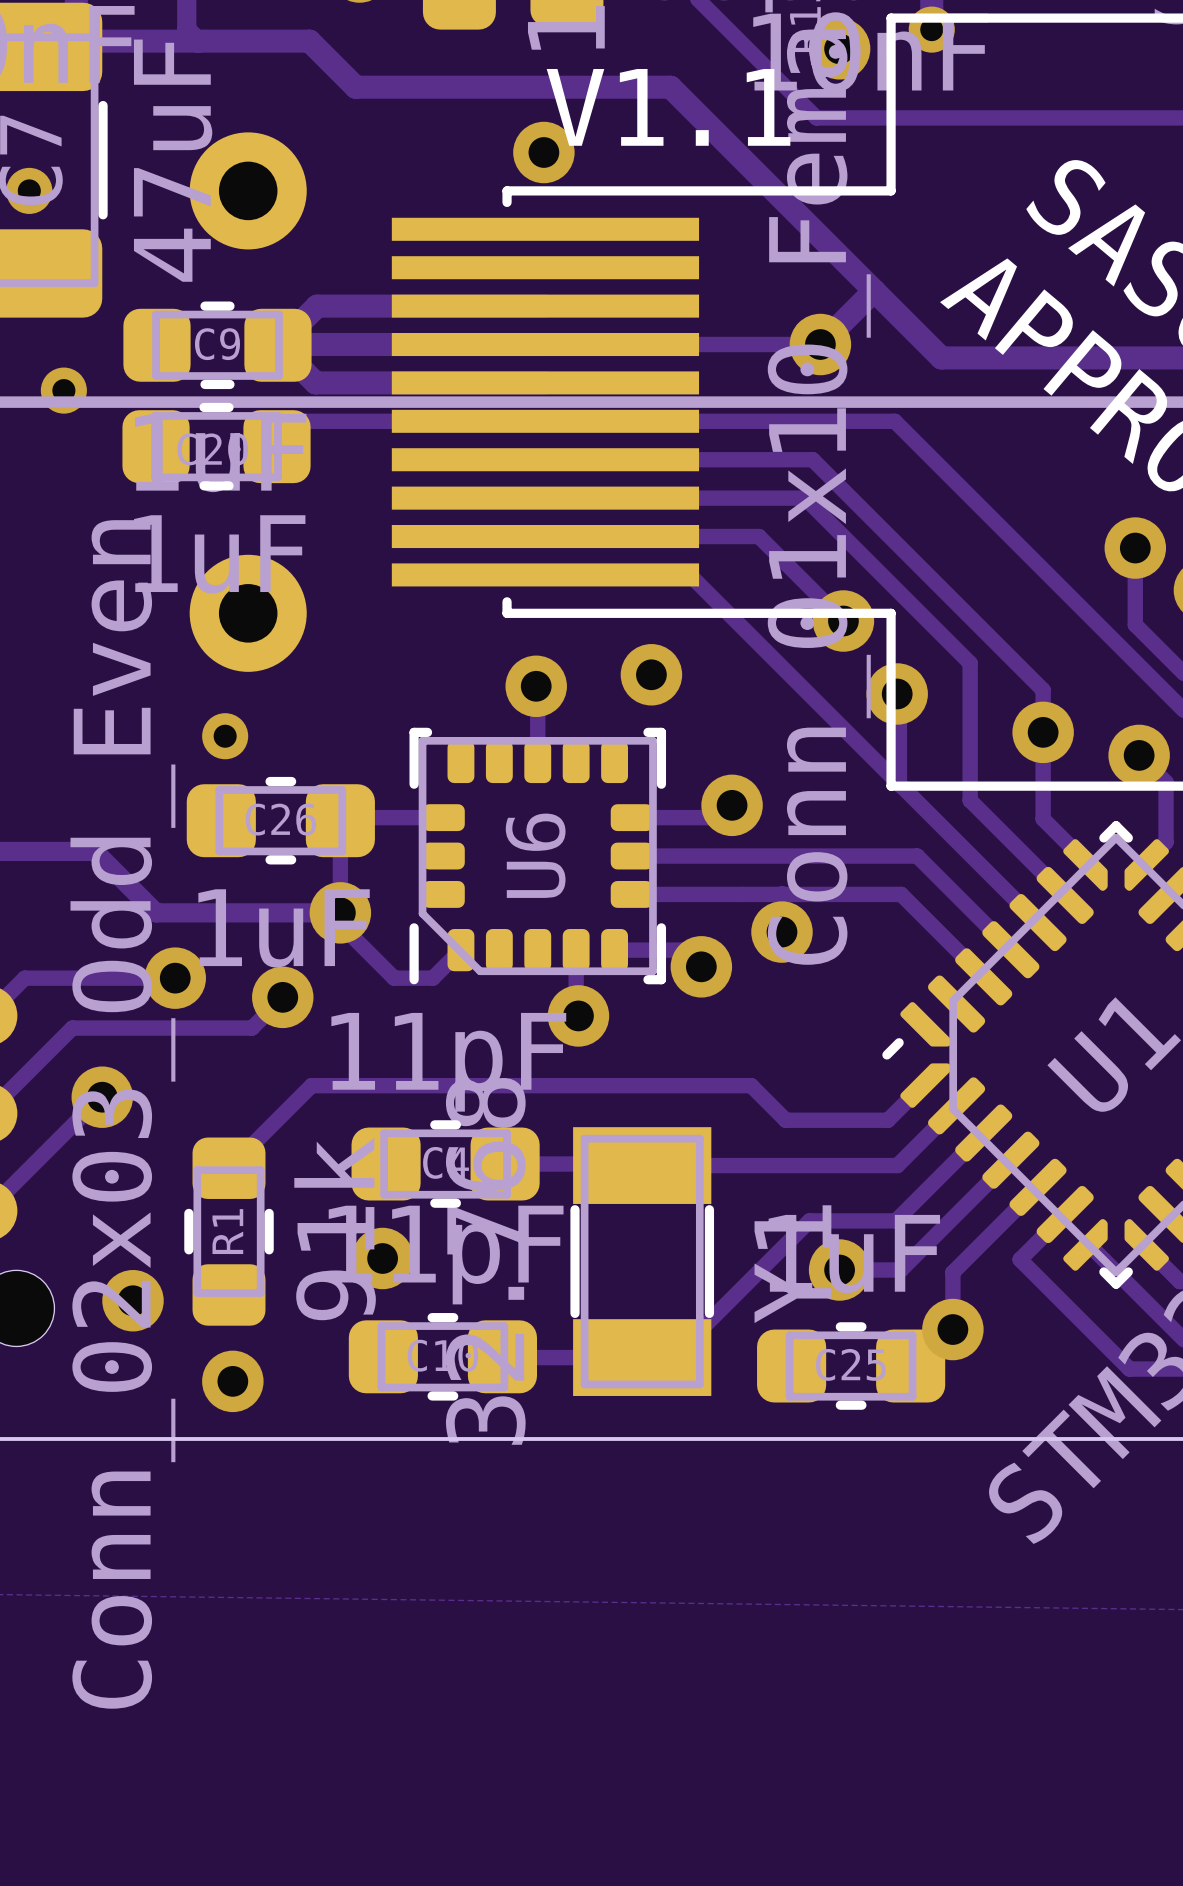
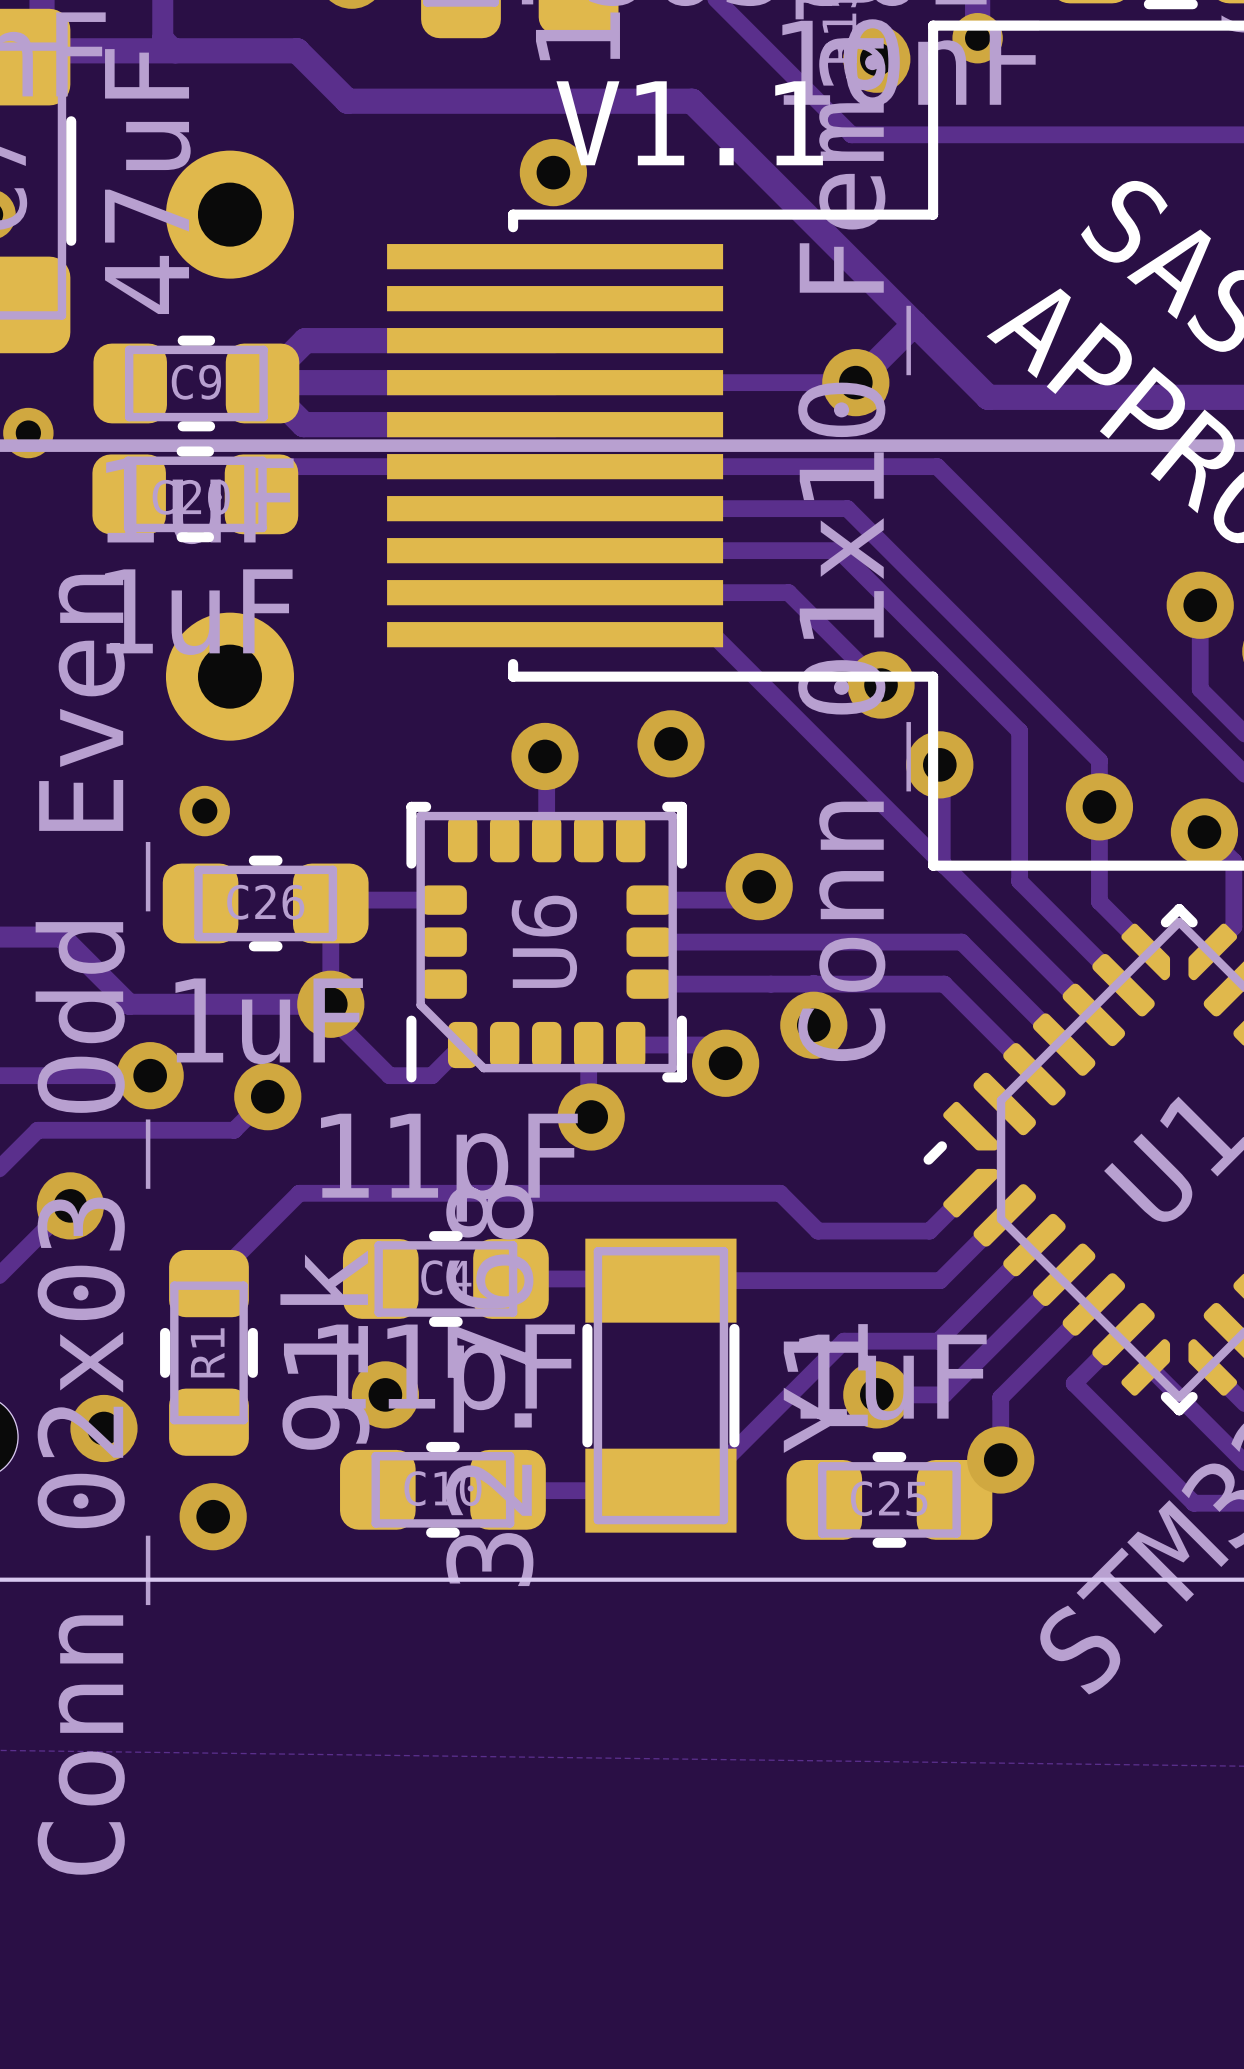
via position: (382, 1258) -> (385, 1394)

